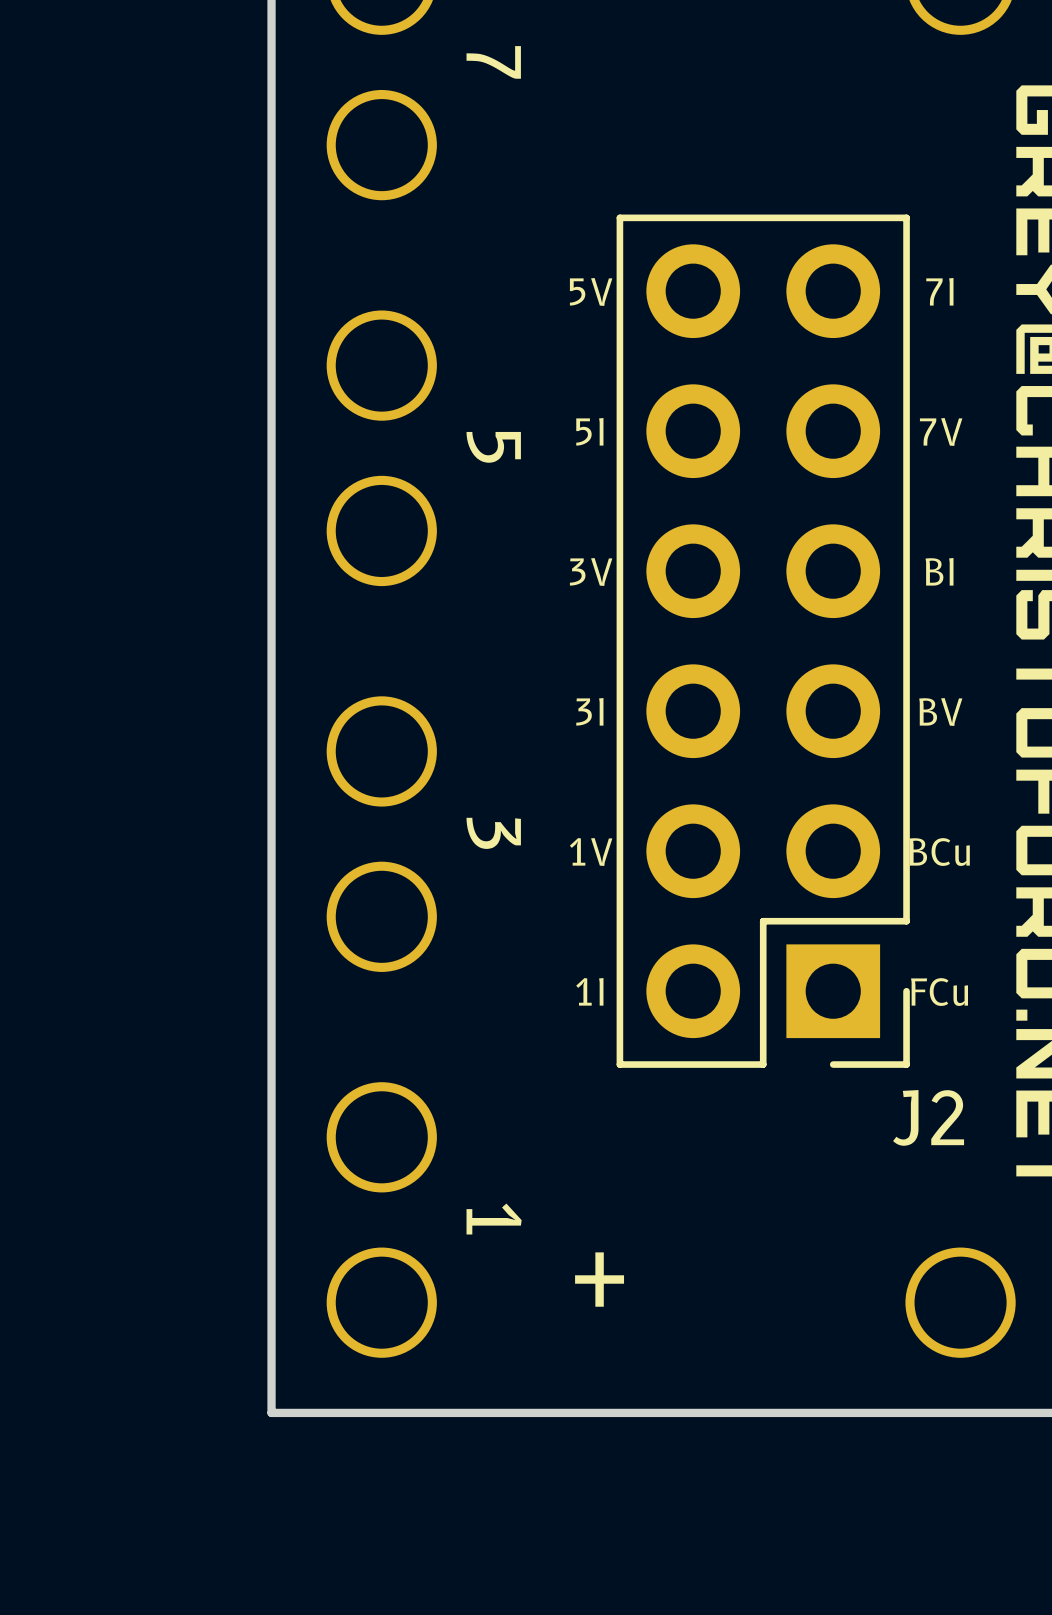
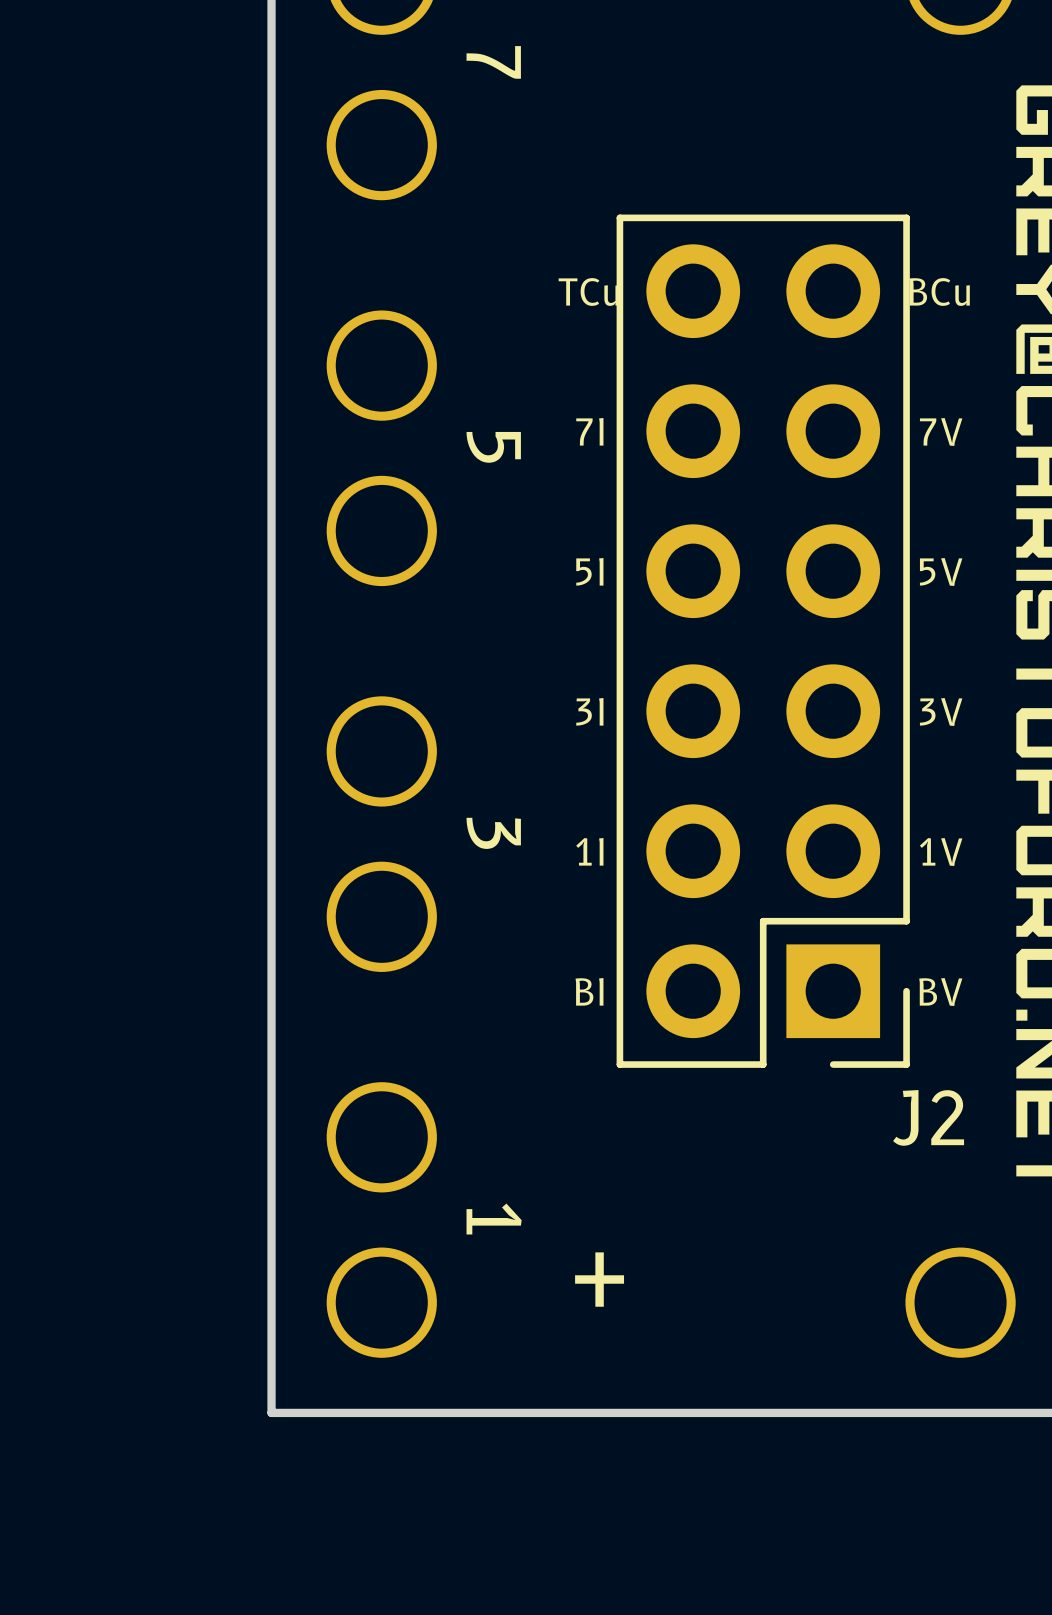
text: 5V (591, 291) -> TCu (588, 291)
text: 7I (939, 291) -> BCu (939, 291)
text: 5I (589, 431) -> 7I (589, 431)
text: BI (939, 571) -> 5V (941, 572)
text: 3V (591, 572) -> 5I (589, 571)
text: BV (940, 712) -> 3V (941, 712)
text: 1V (591, 852) -> 1I (589, 851)
text: BCu (939, 852) -> 1V (941, 852)
text: 1I (589, 991) -> BI (589, 991)
text: FCu (939, 992) -> BV (940, 992)

